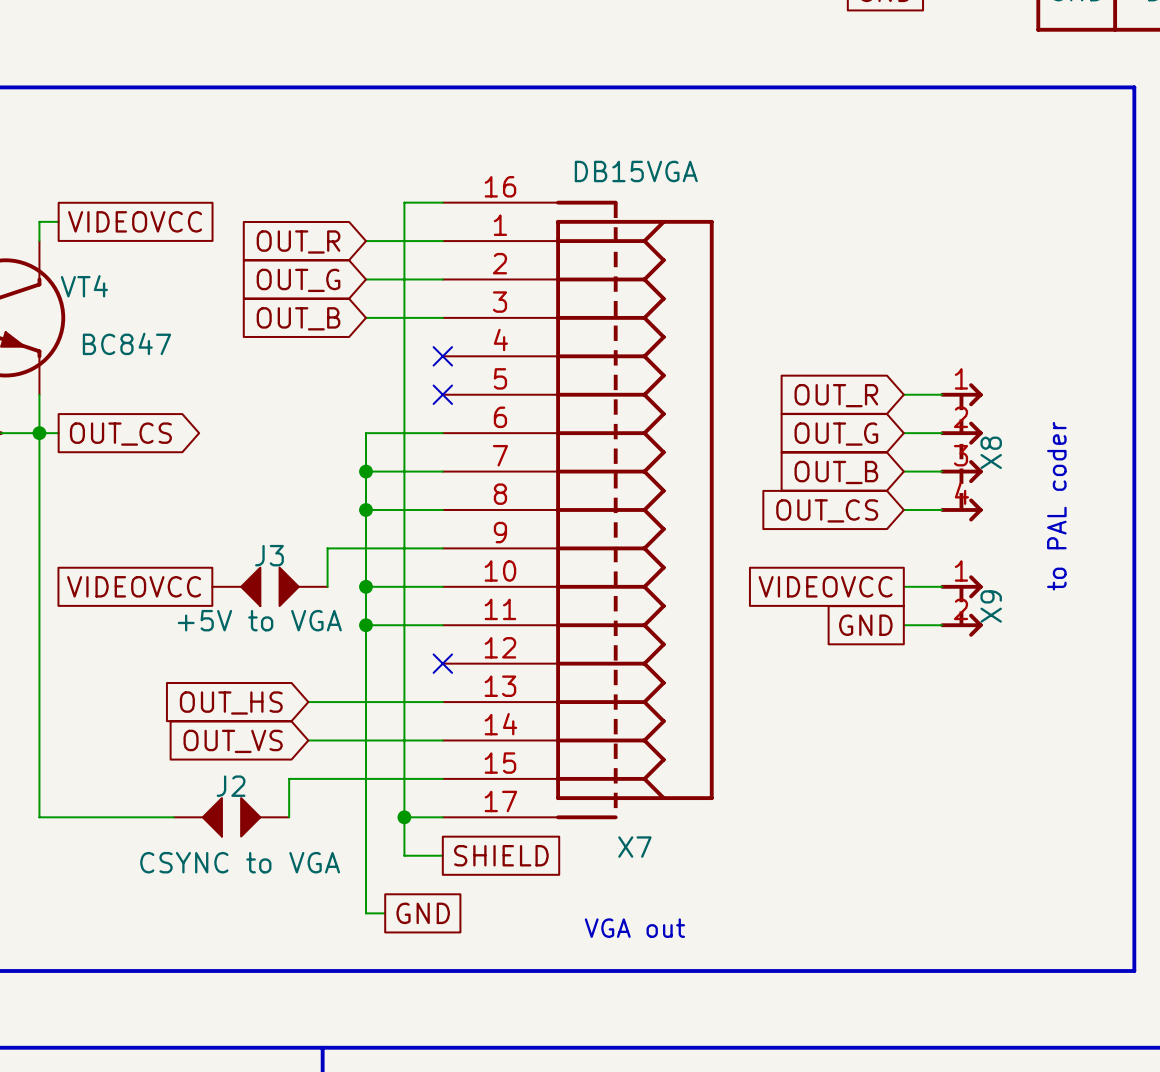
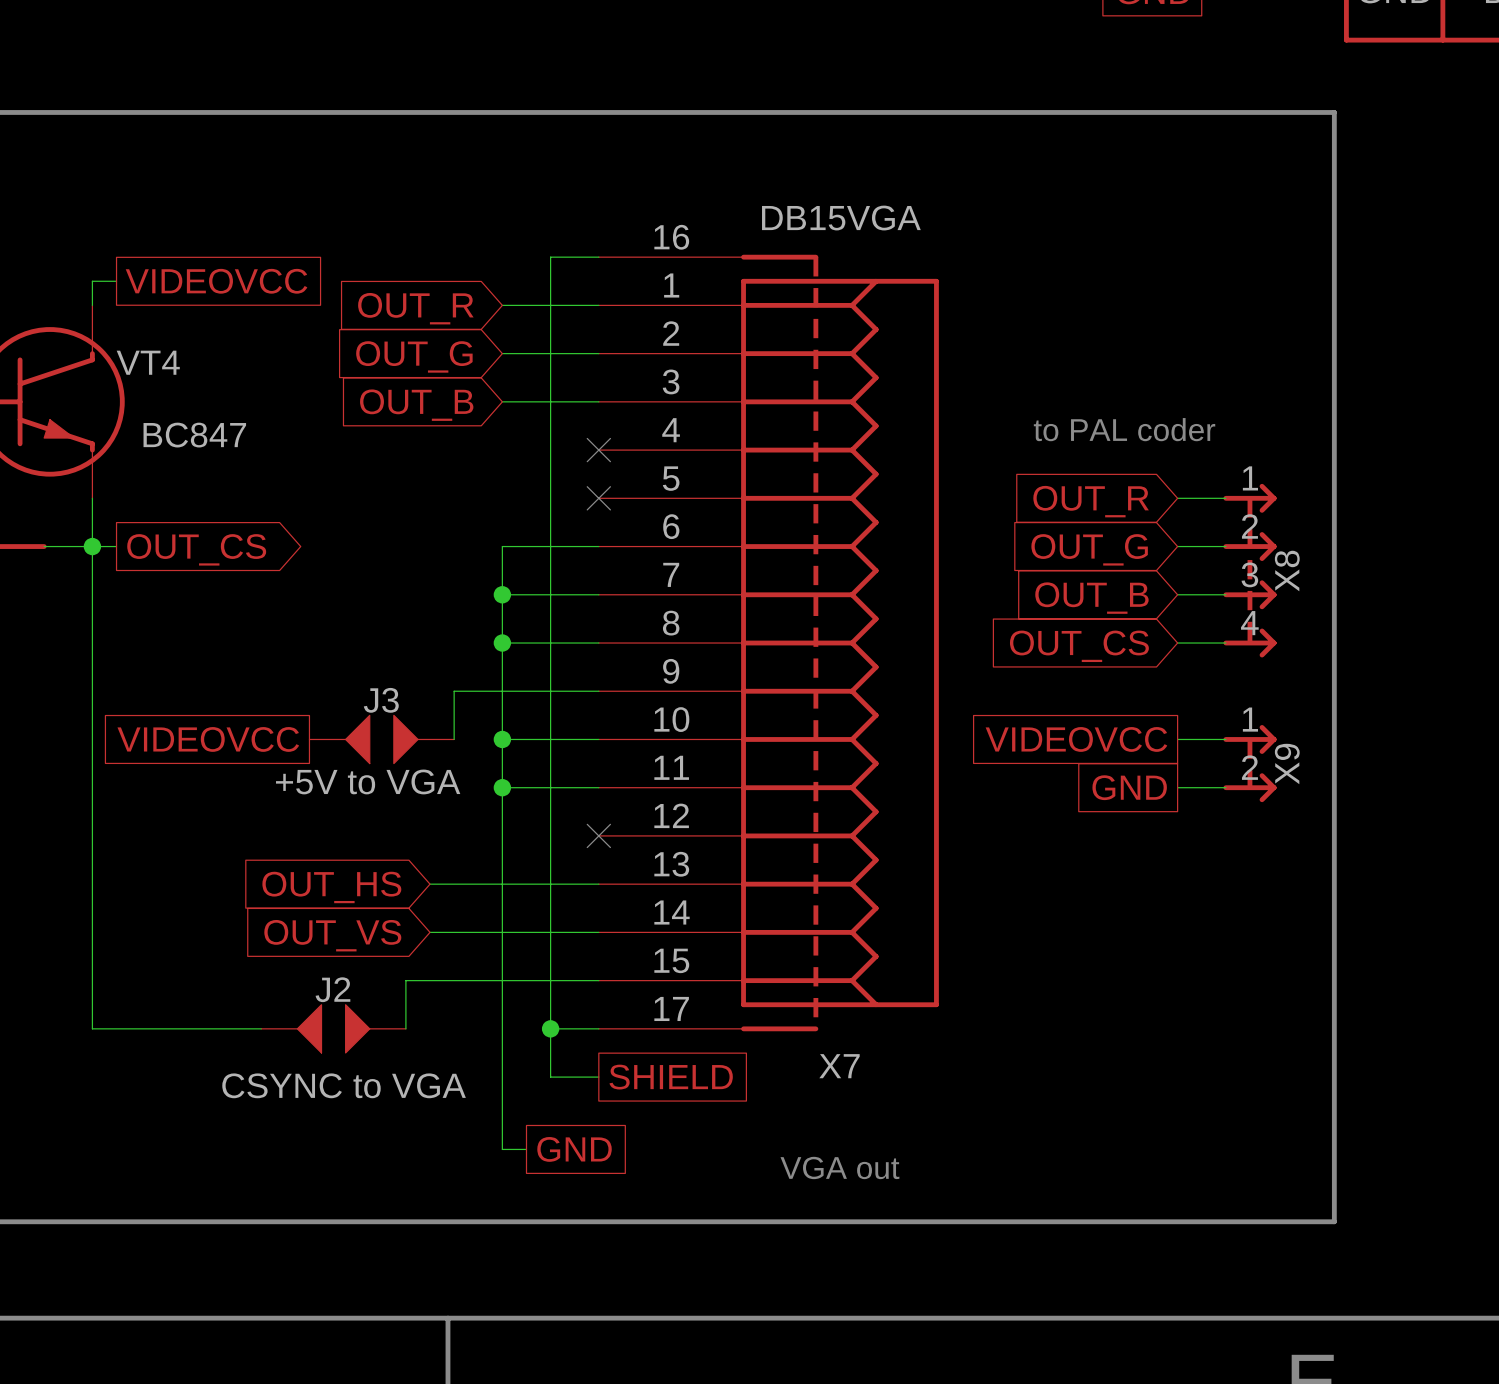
line: (1028, 87) (1134, 87) (1134, 970) (1028, 970) -> (1334, 112) (1334, 1221)
text rotation: 0° (1056, 506) -> 90° clockwise (1124, 429)
text position: to PAL coder (1056, 506) -> to PAL coder (1124, 429)

